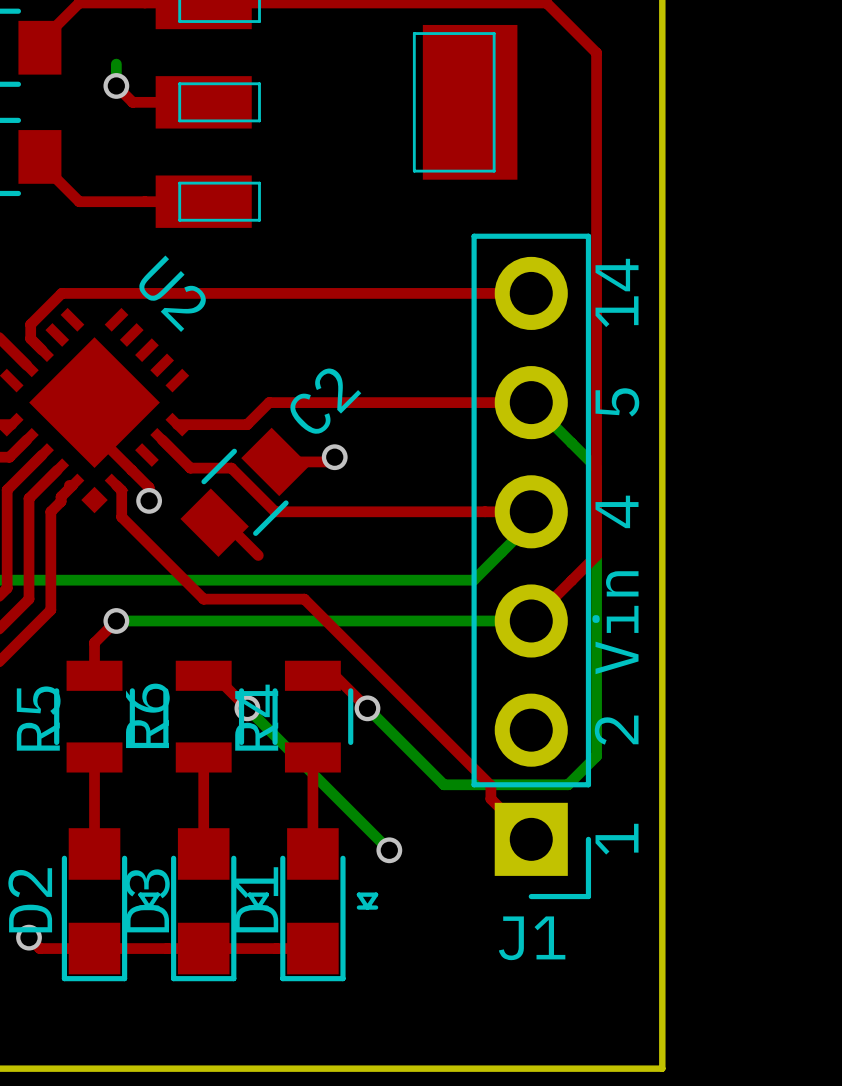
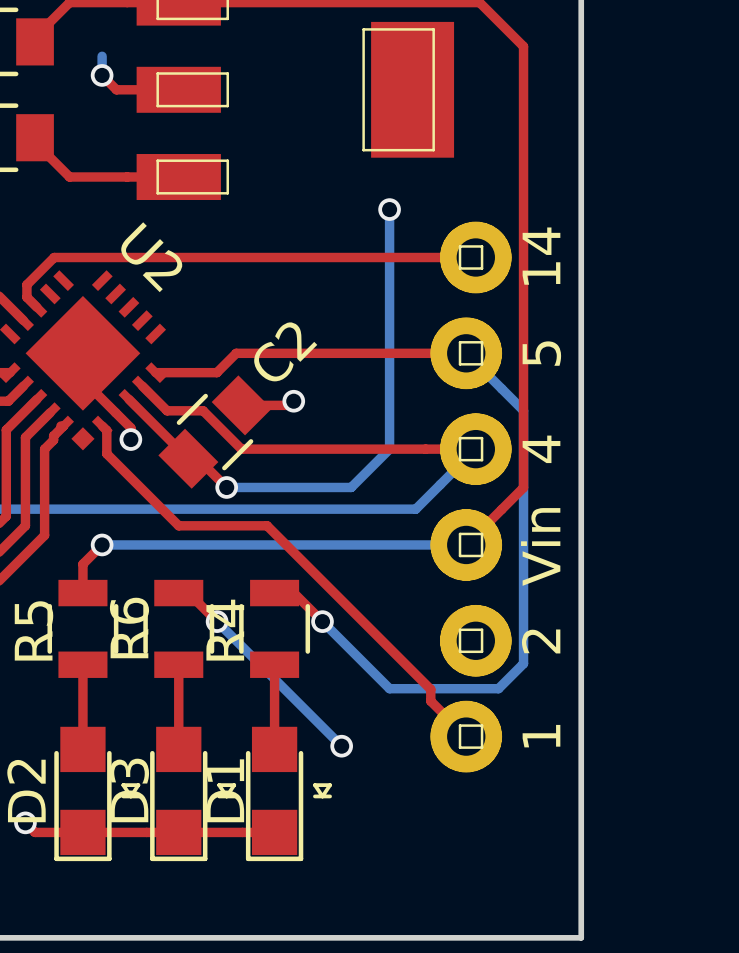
bottom track: none -> (389, 209) (389, 449) (351, 487) (226, 487)
via: none -> (389, 209)
top track: none -> (128, 399) (188, 458)
via: none -> (226, 487)
J1: (531, 566) -> none
part: none -> (471, 497)

